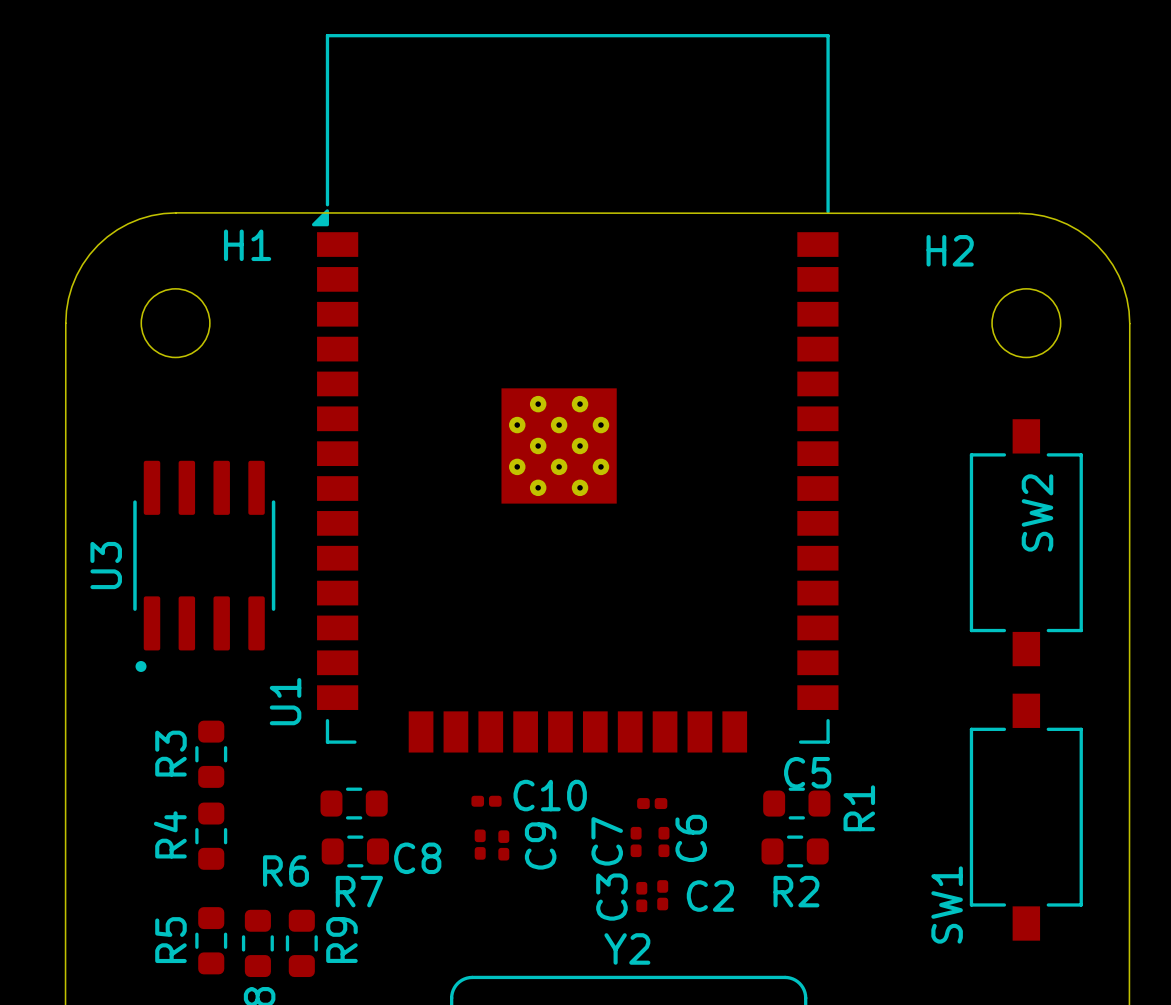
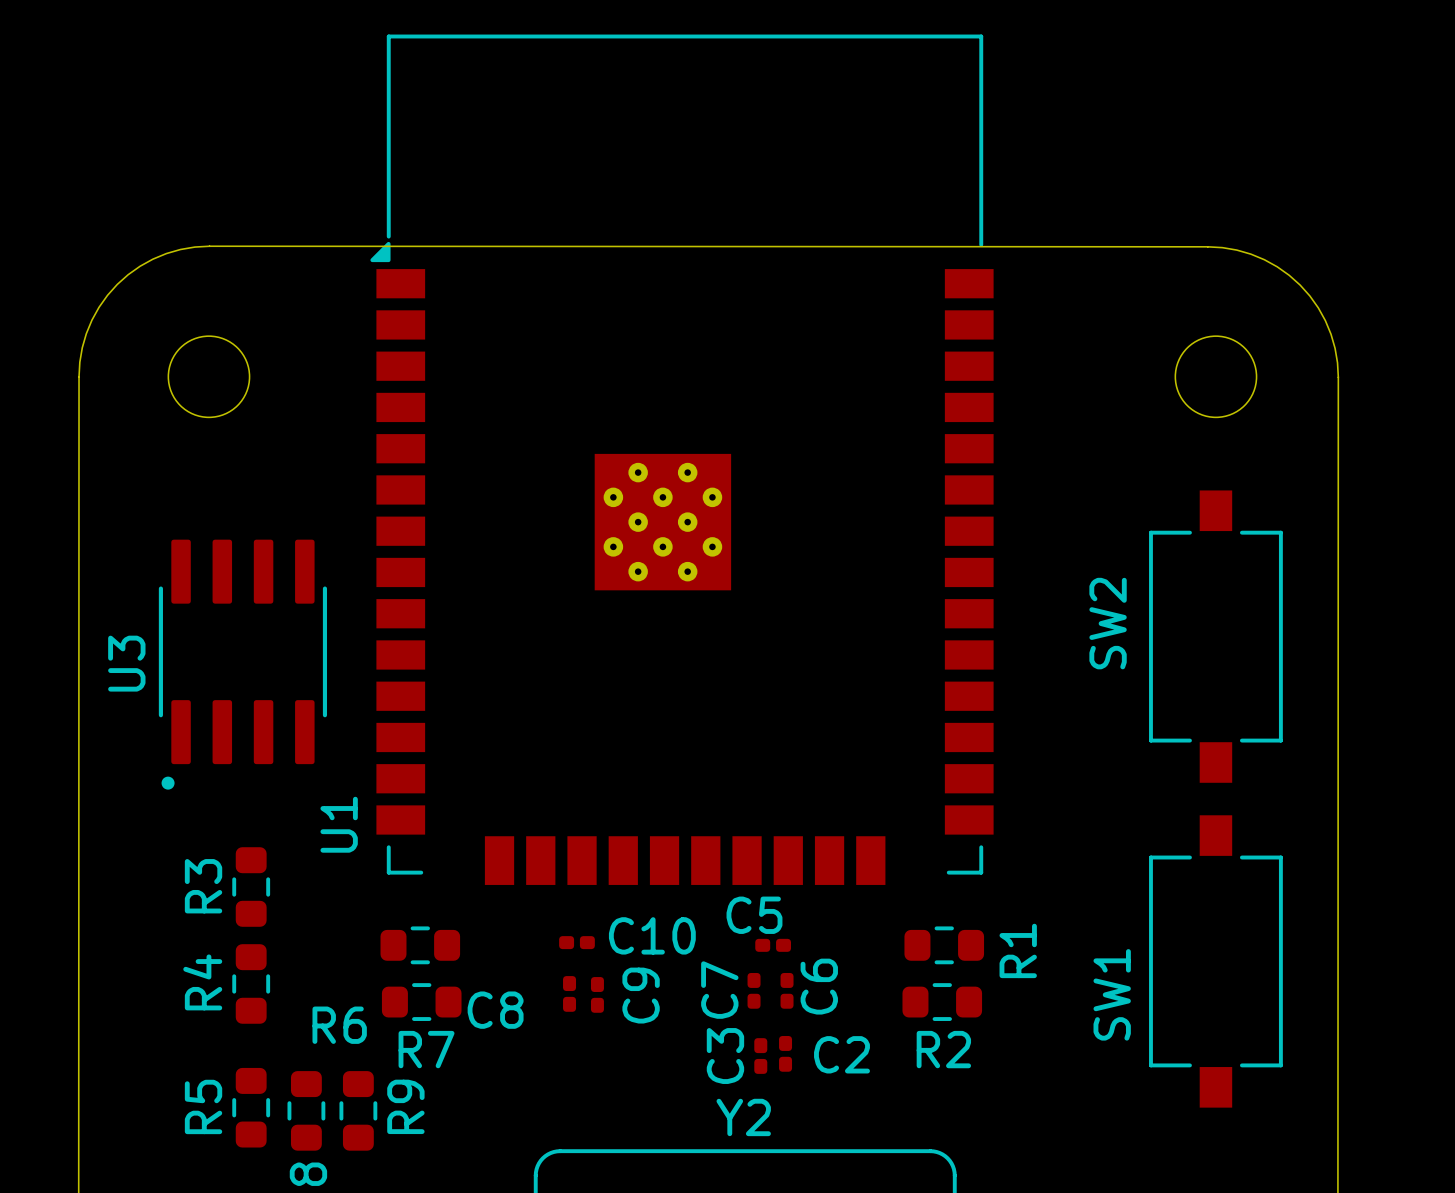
H1 name: H1 (247, 245) -> none
H2 name: H2 (950, 250) -> none
SW2 name position: SW2 (1037, 512) -> SW2 (1108, 623)
C5 name position: C5 (807, 772) -> C5 (754, 915)
SW1 name position: SW1 (947, 904) -> SW1 (1112, 994)

